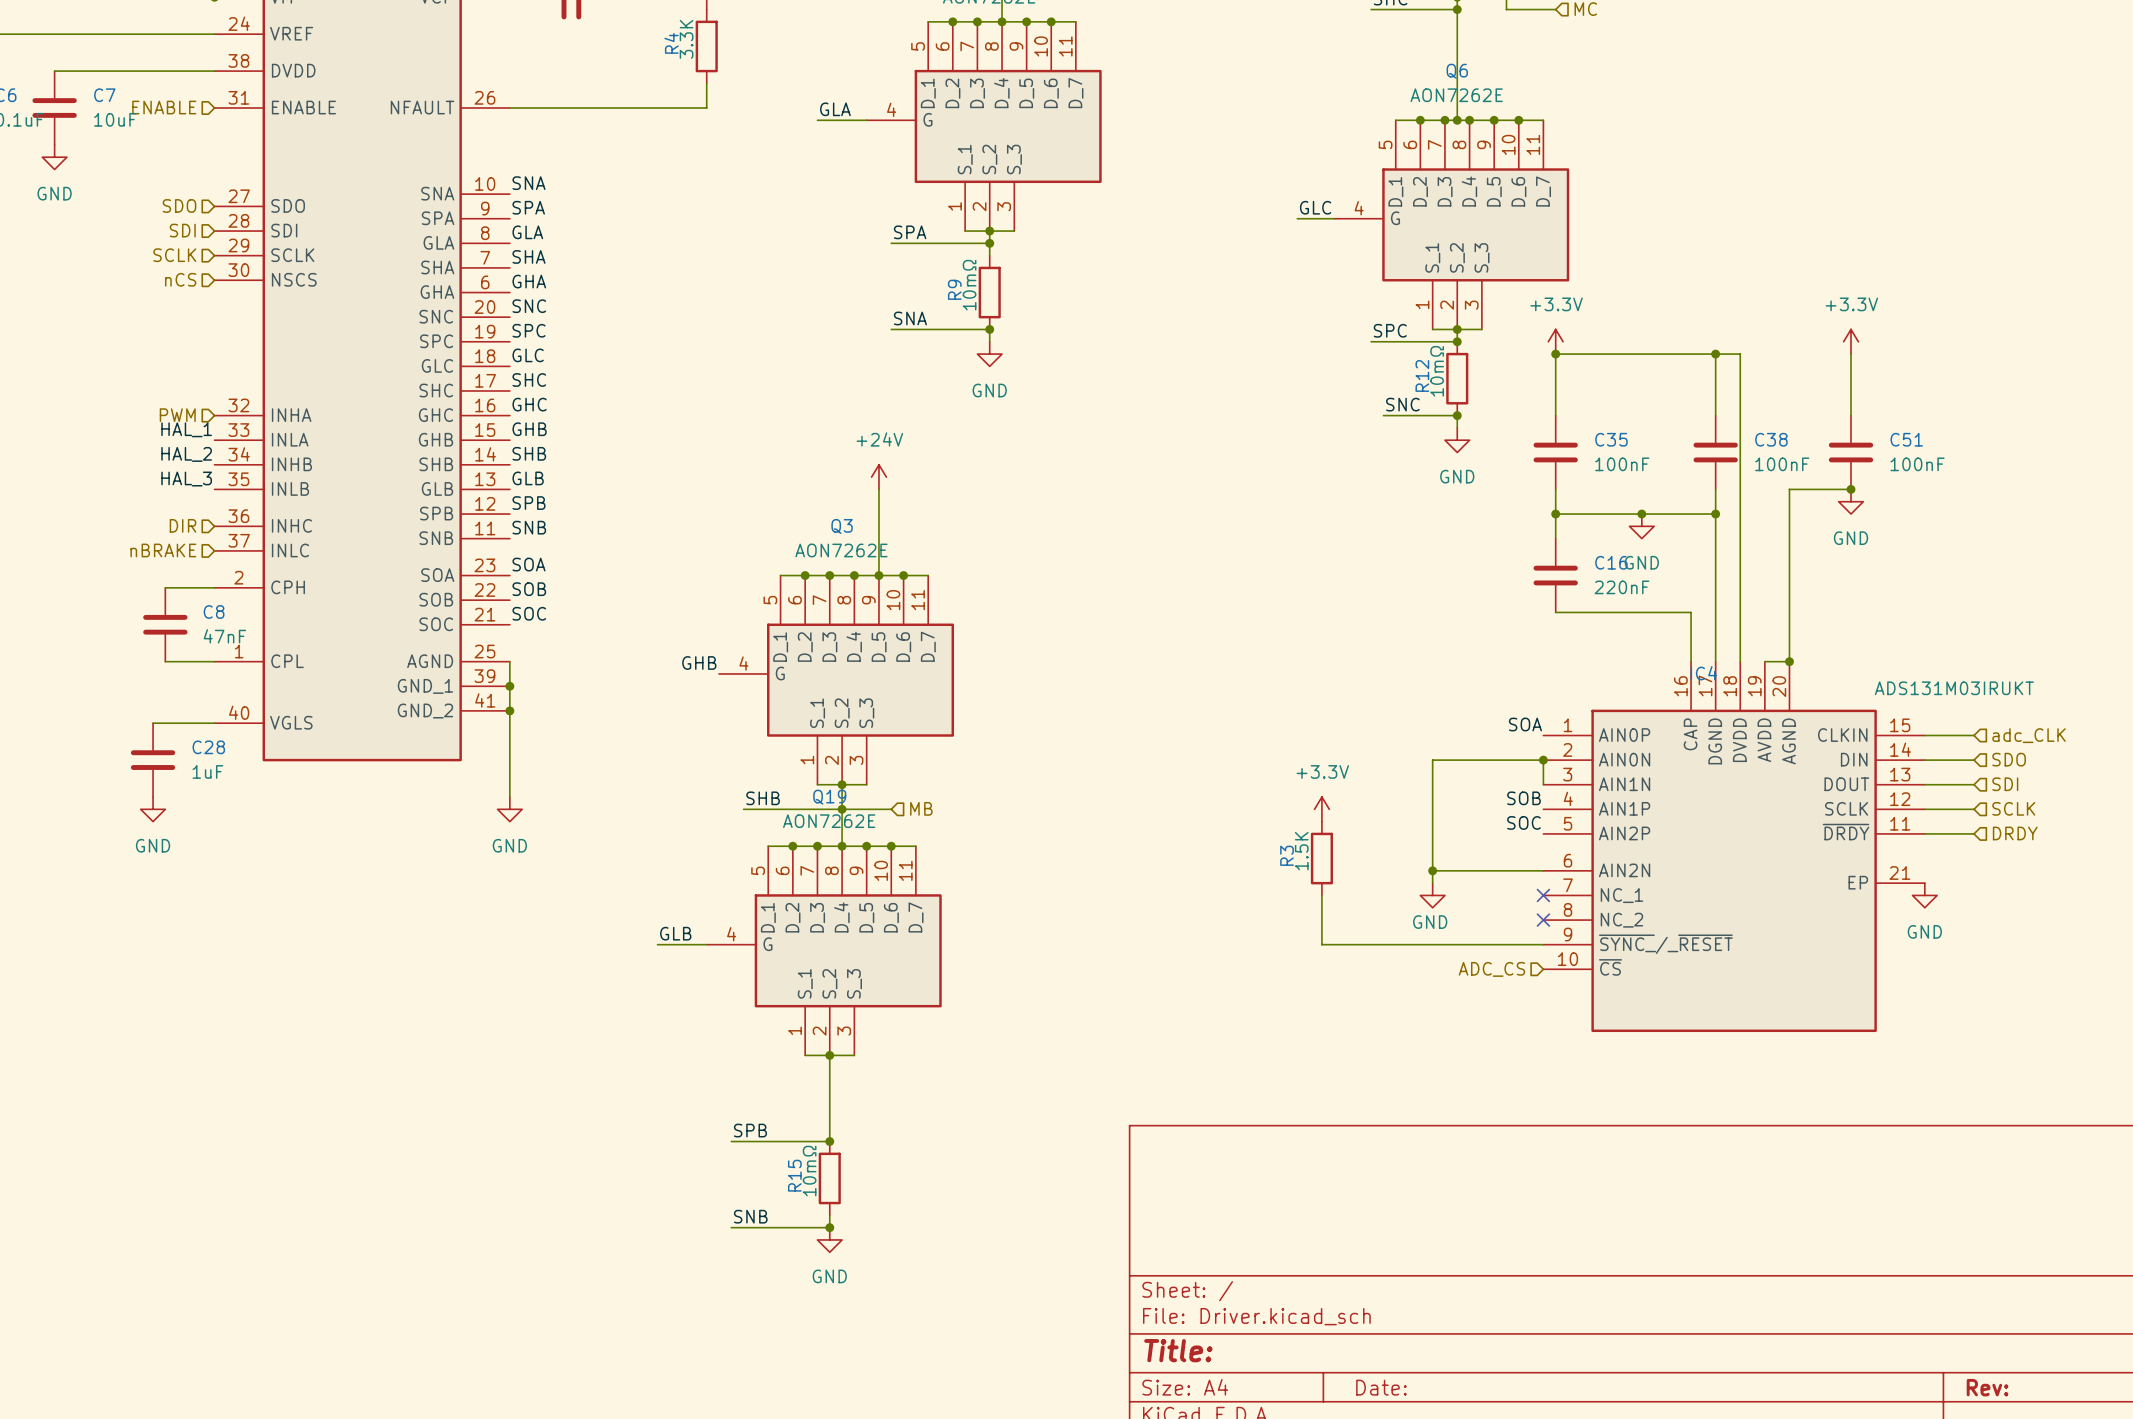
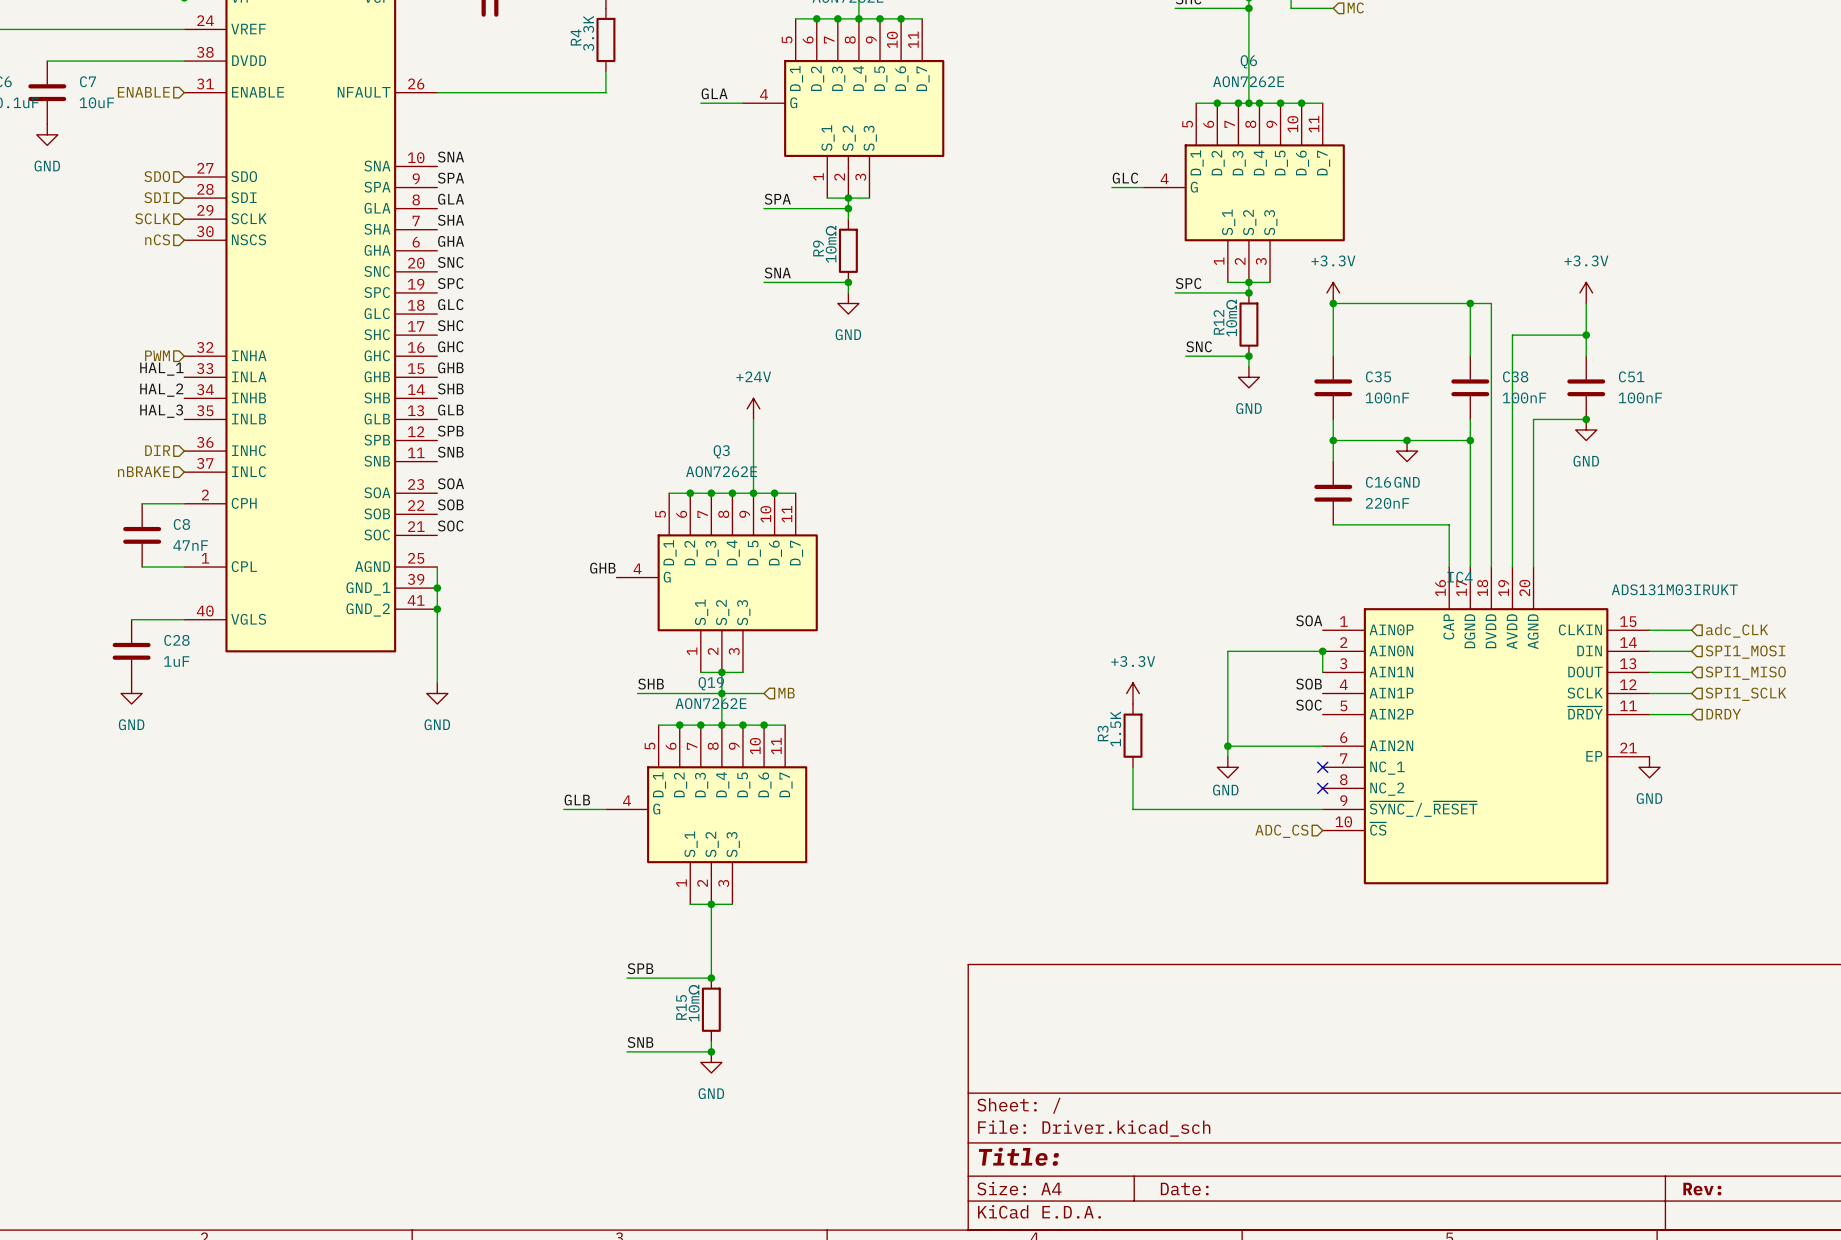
junction: none -> (1586, 335)
wire: (1764, 661) (1789, 661) -> (1512, 567) (1512, 335) (1586, 335)
junction: (1789, 661) -> none
hierarchical label: SDO (2009, 759) -> SPI1_MOSI (1745, 652)
hierarchical label: SDI (2005, 784) -> SPI1_MISO (1745, 673)
hierarchical label: SCLK (2013, 808) -> SPI1_SCLK (1745, 694)

